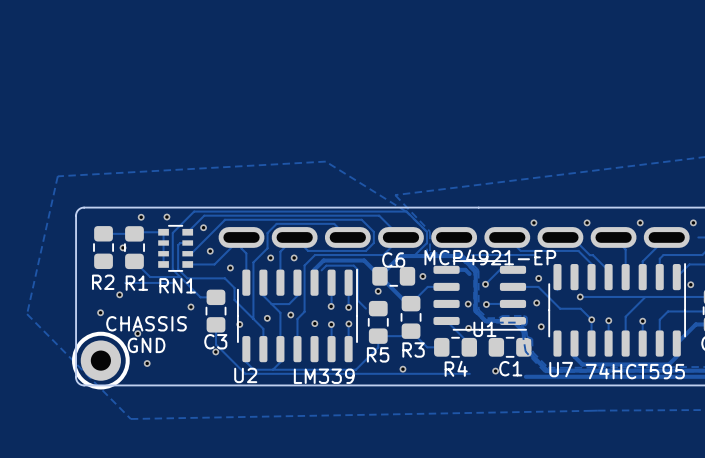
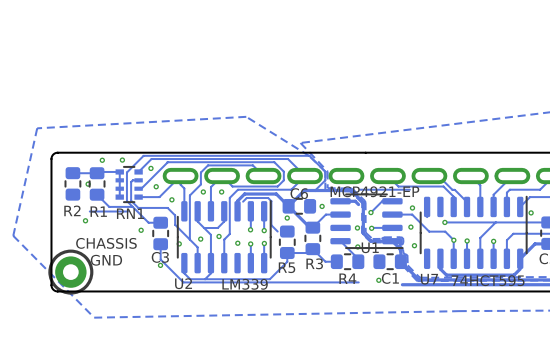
via: (533, 222) -> none
via: (587, 222) -> none
via: (640, 222) -> none
via: (693, 222) -> none
via: (100, 312) -> none
via: (137, 333) -> none
via: (147, 363) -> none
via: (402, 369) -> none

